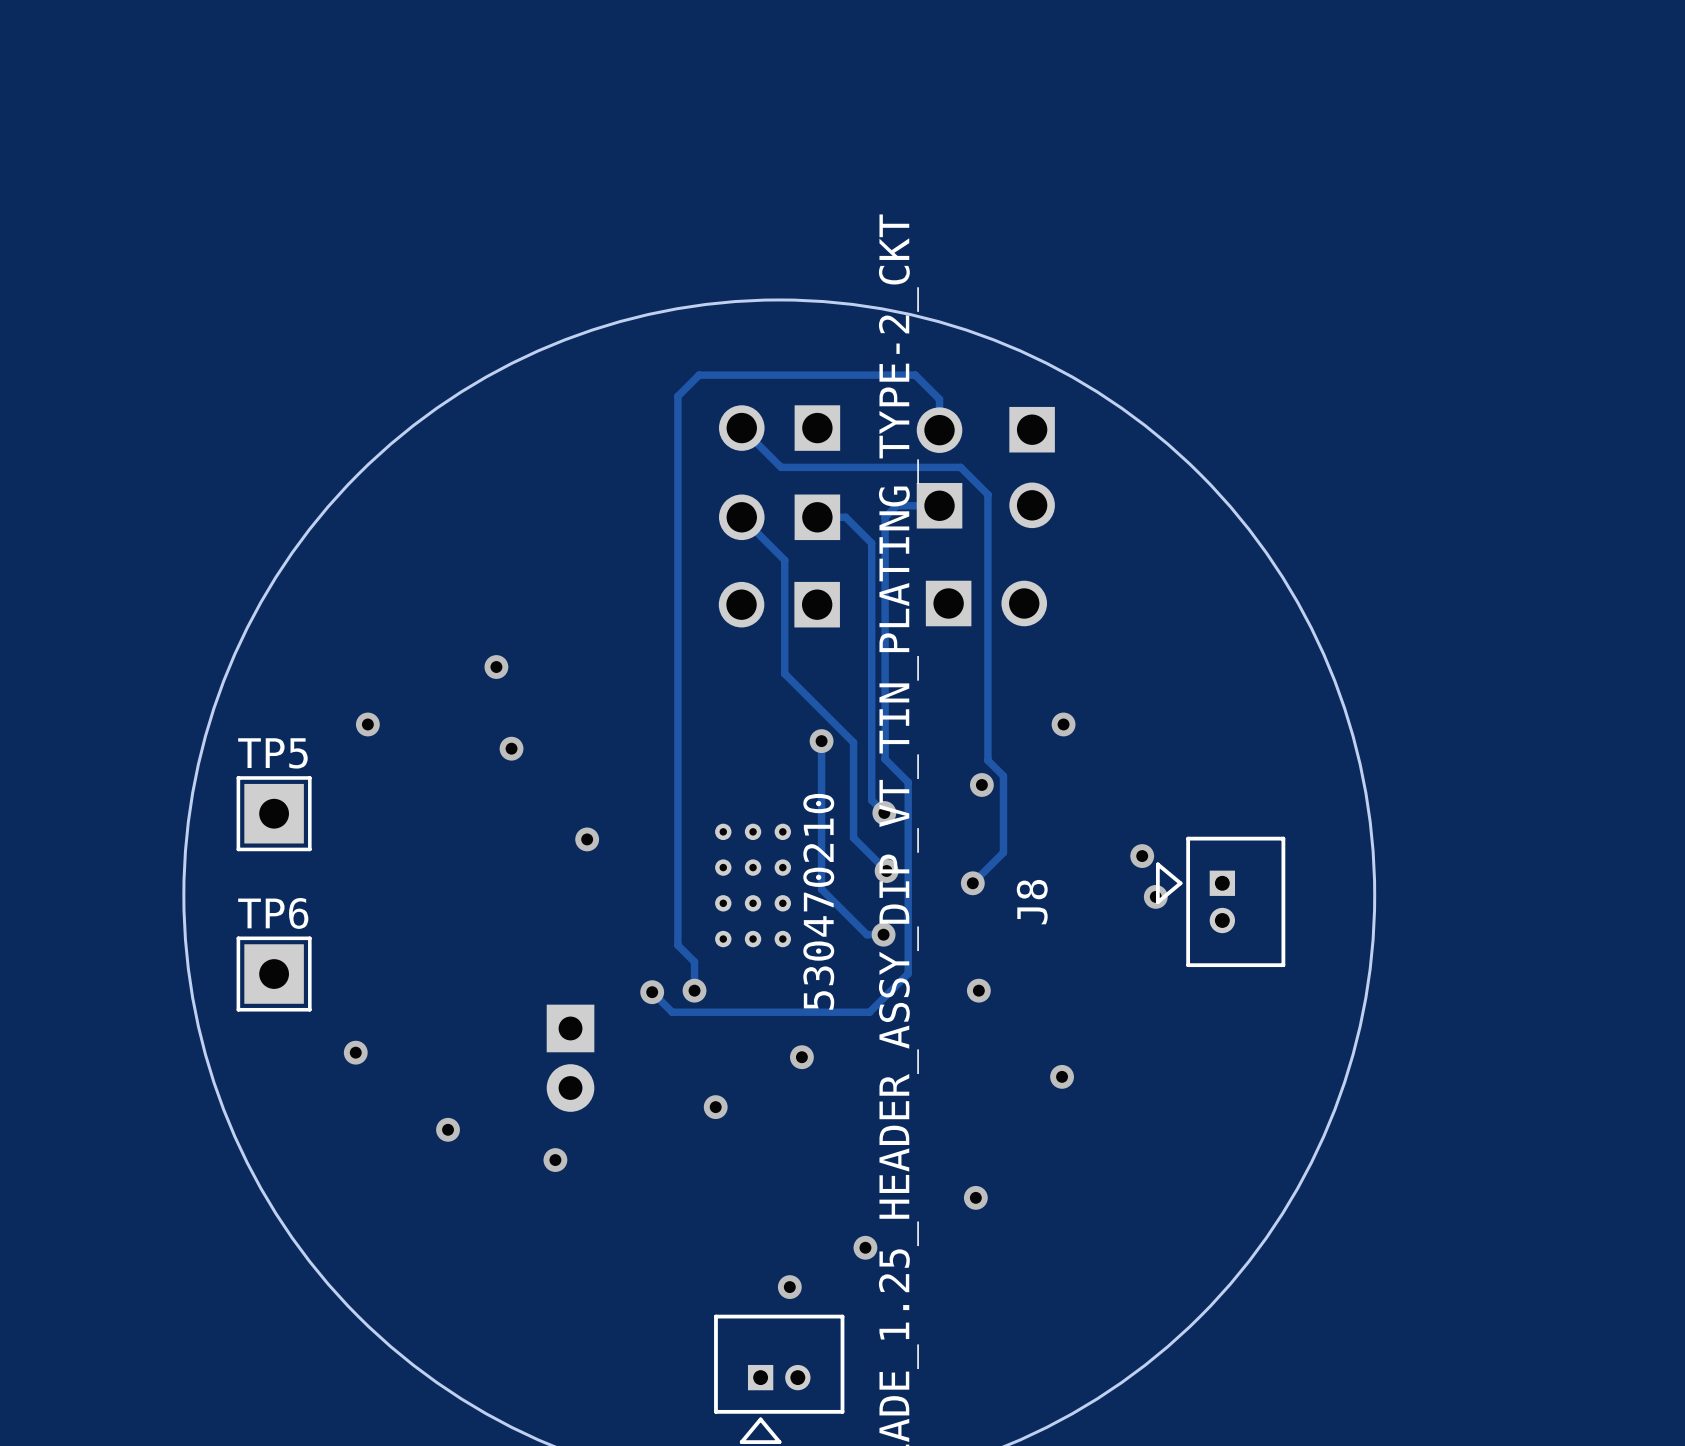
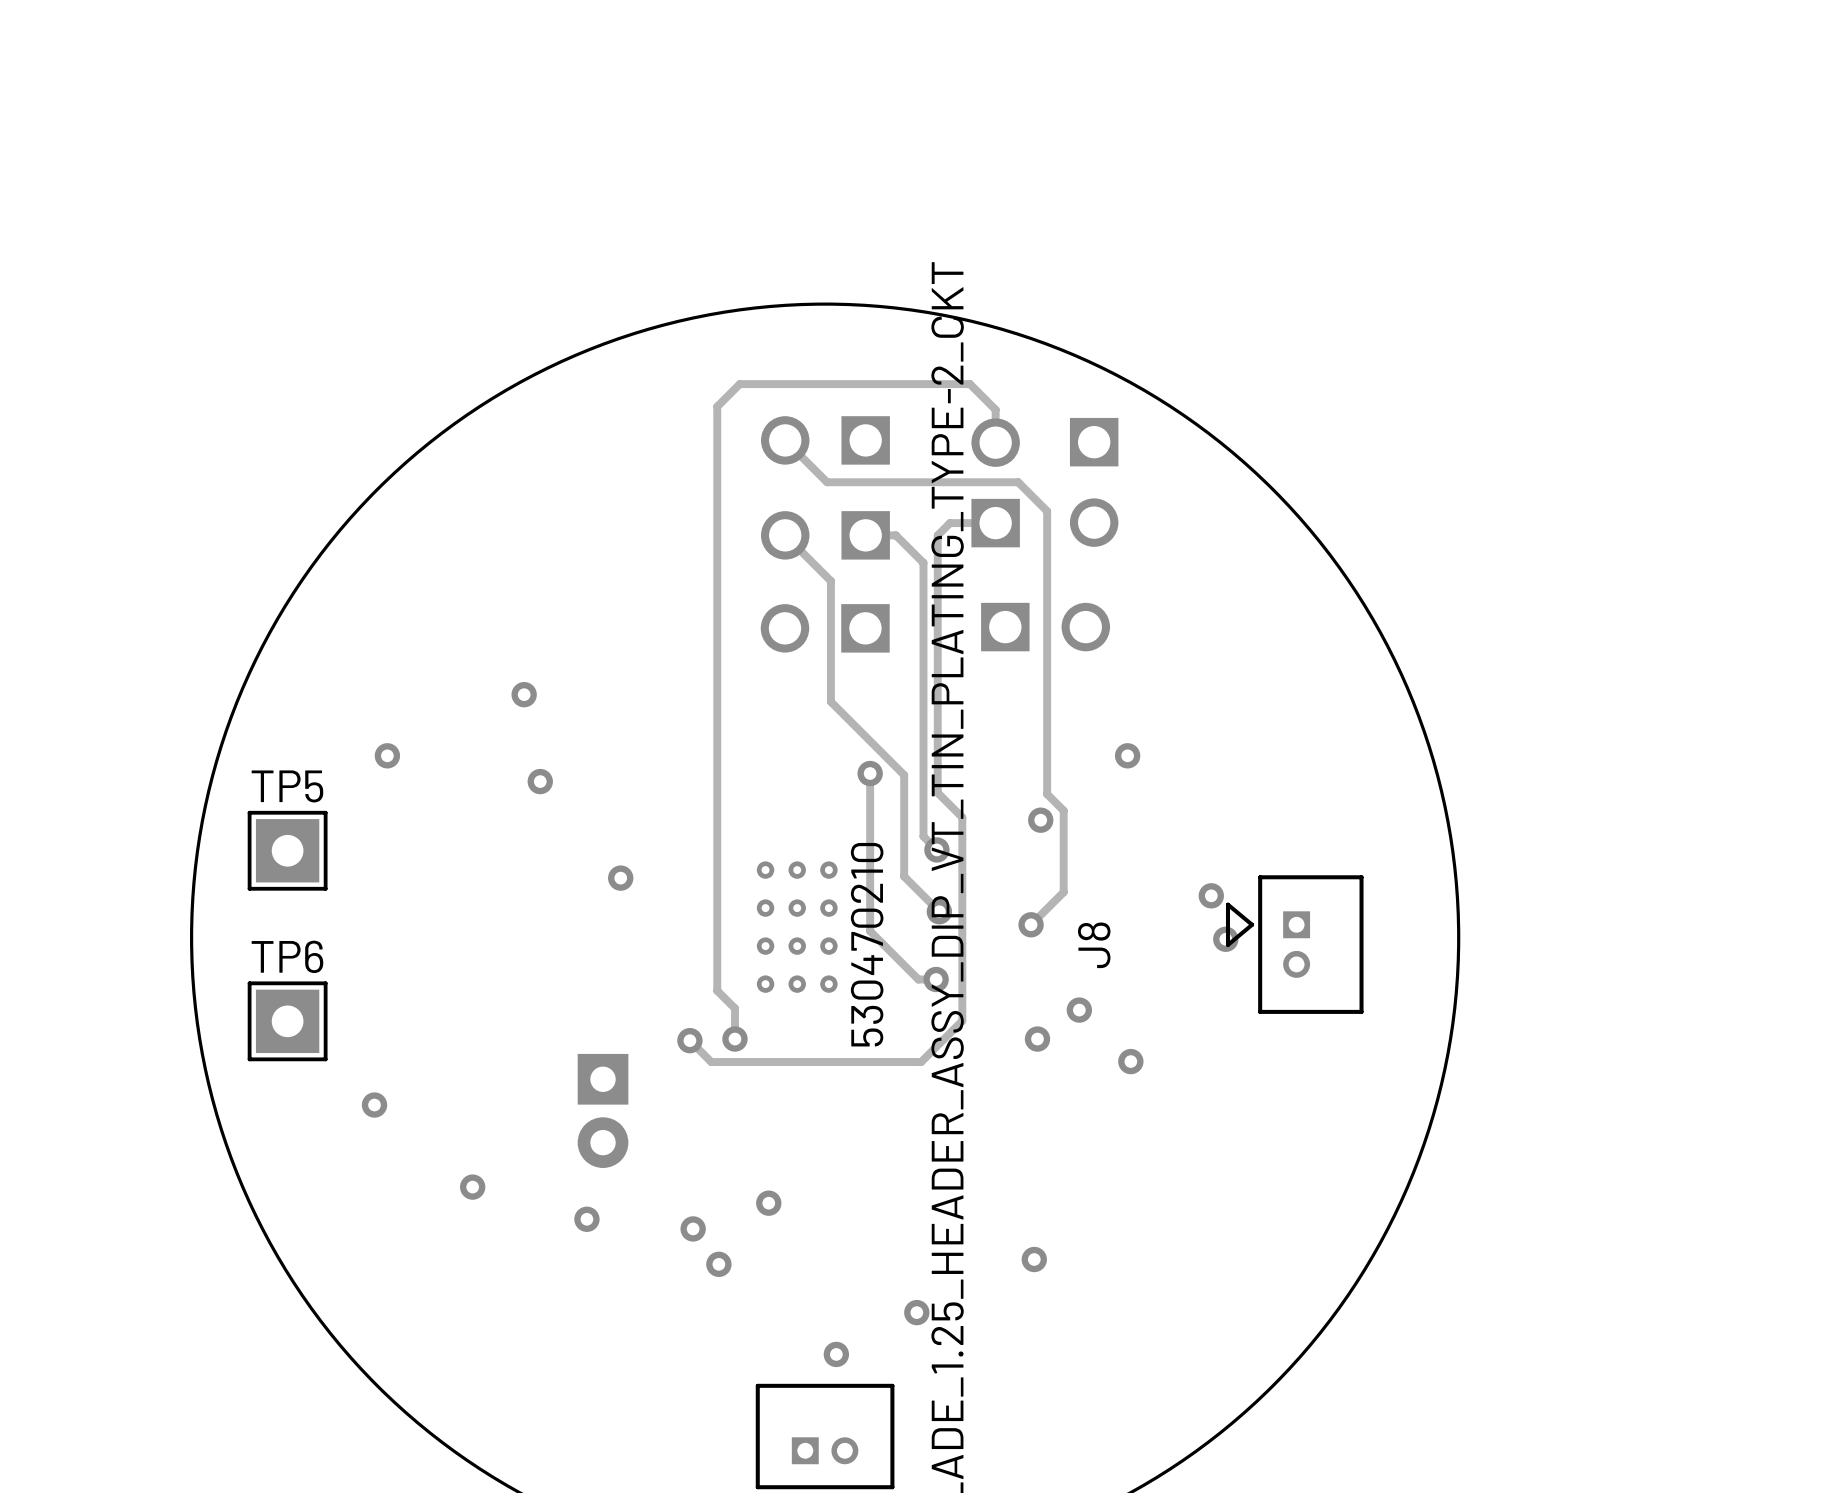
via: none -> (1079, 1010)
via: none -> (1130, 1061)
via: (801, 1057) -> none
via: (1062, 1076) -> none
via position: (715, 1107) -> (768, 1203)
via: none -> (693, 1228)
via: none -> (718, 1264)

